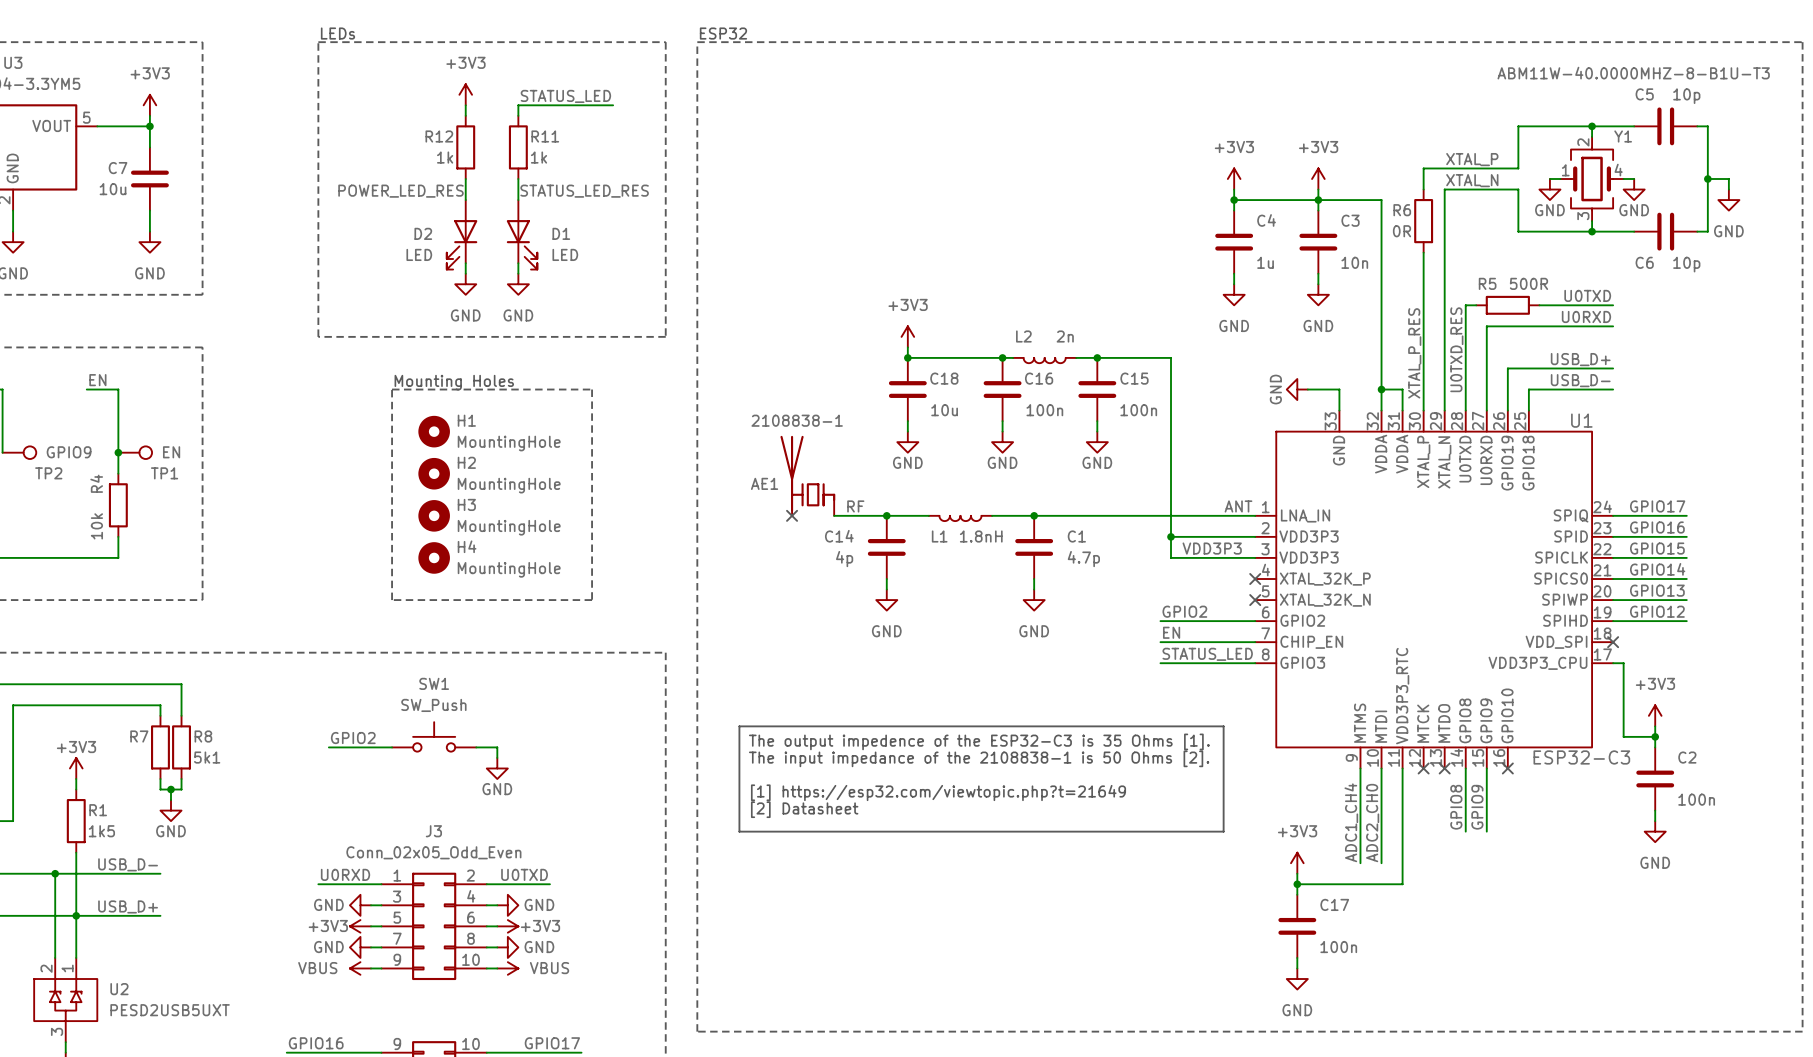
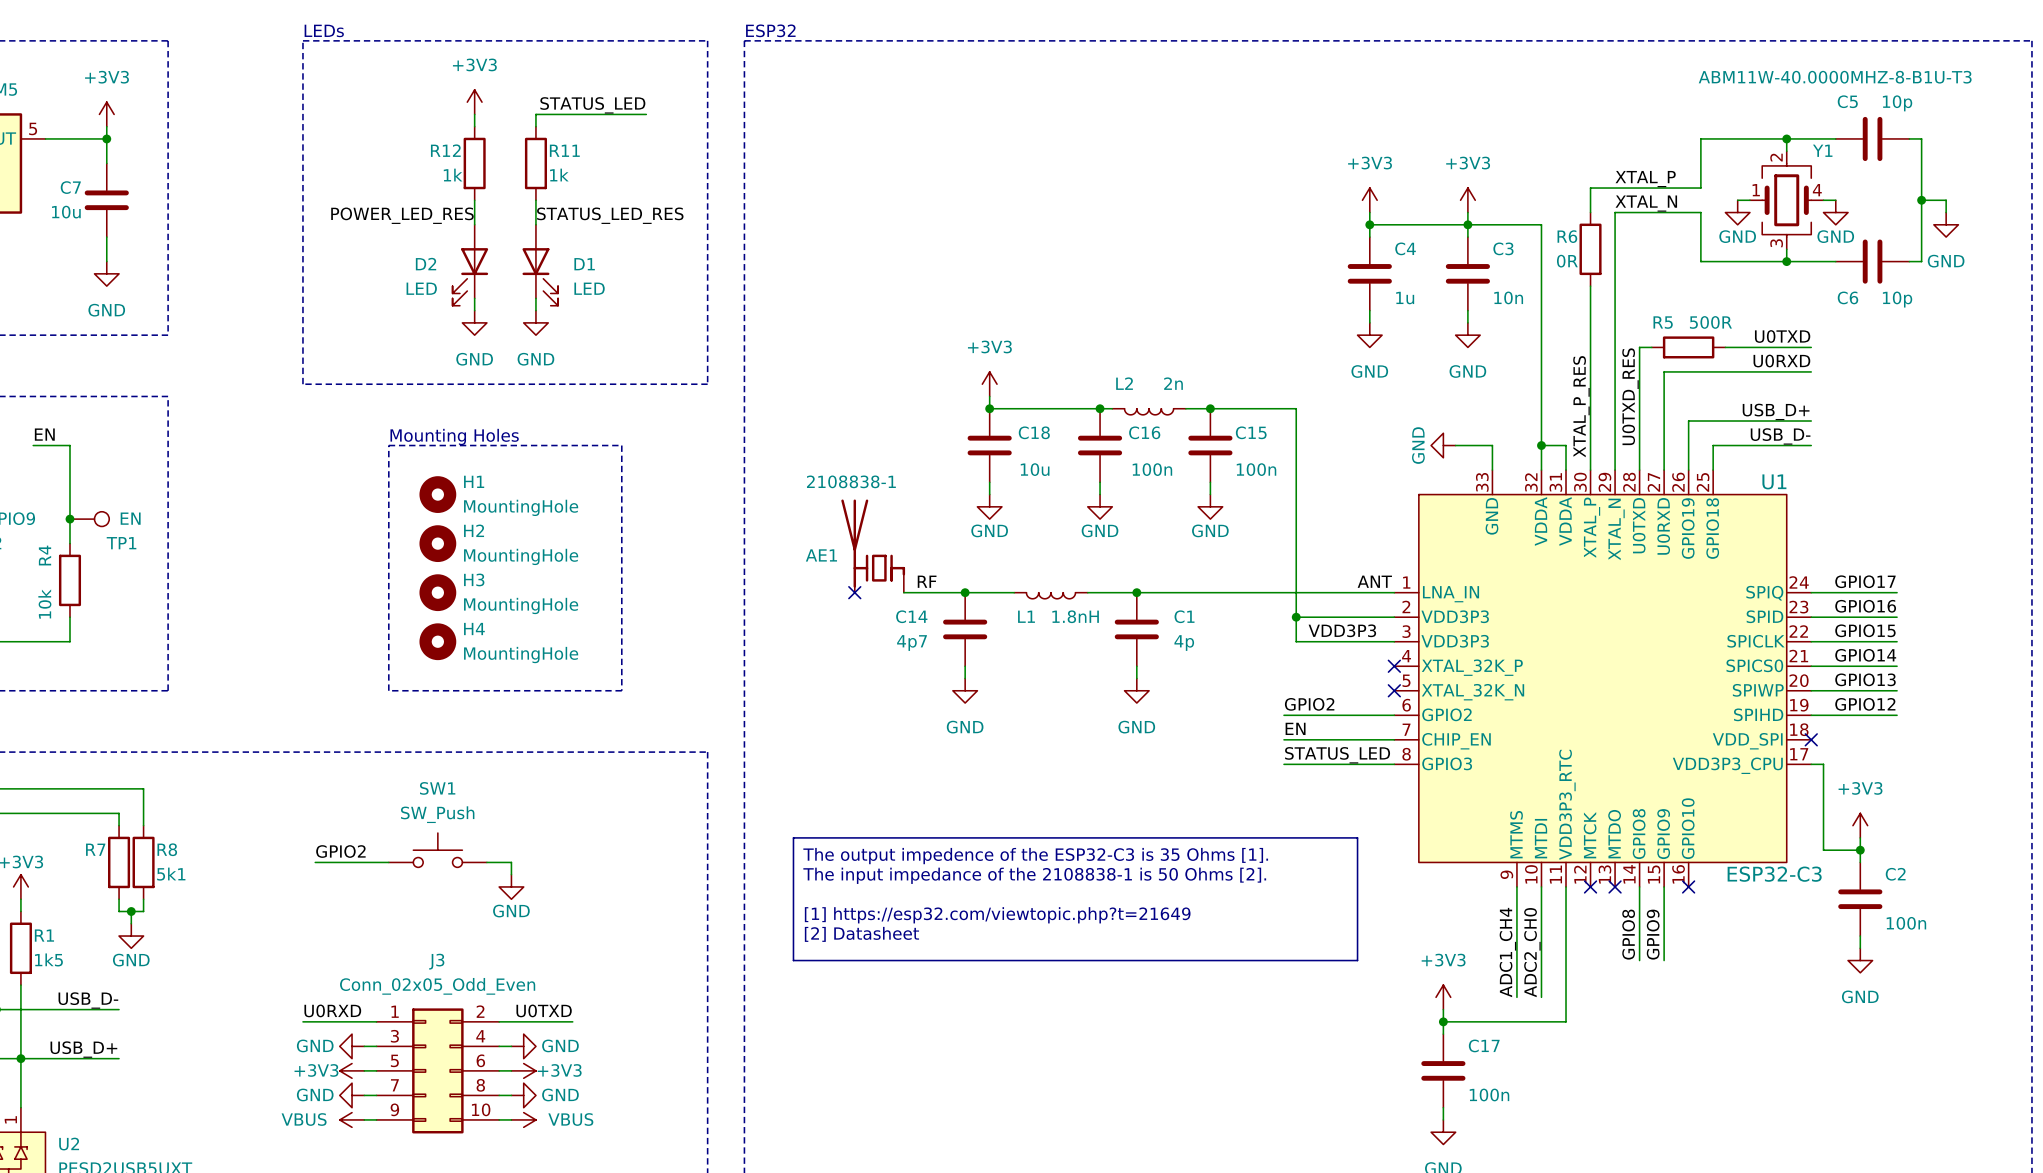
C14 value: 4p (844, 559) -> 4p7 (912, 643)
C1 value: 4.7p (1083, 559) -> 4p (1184, 643)

